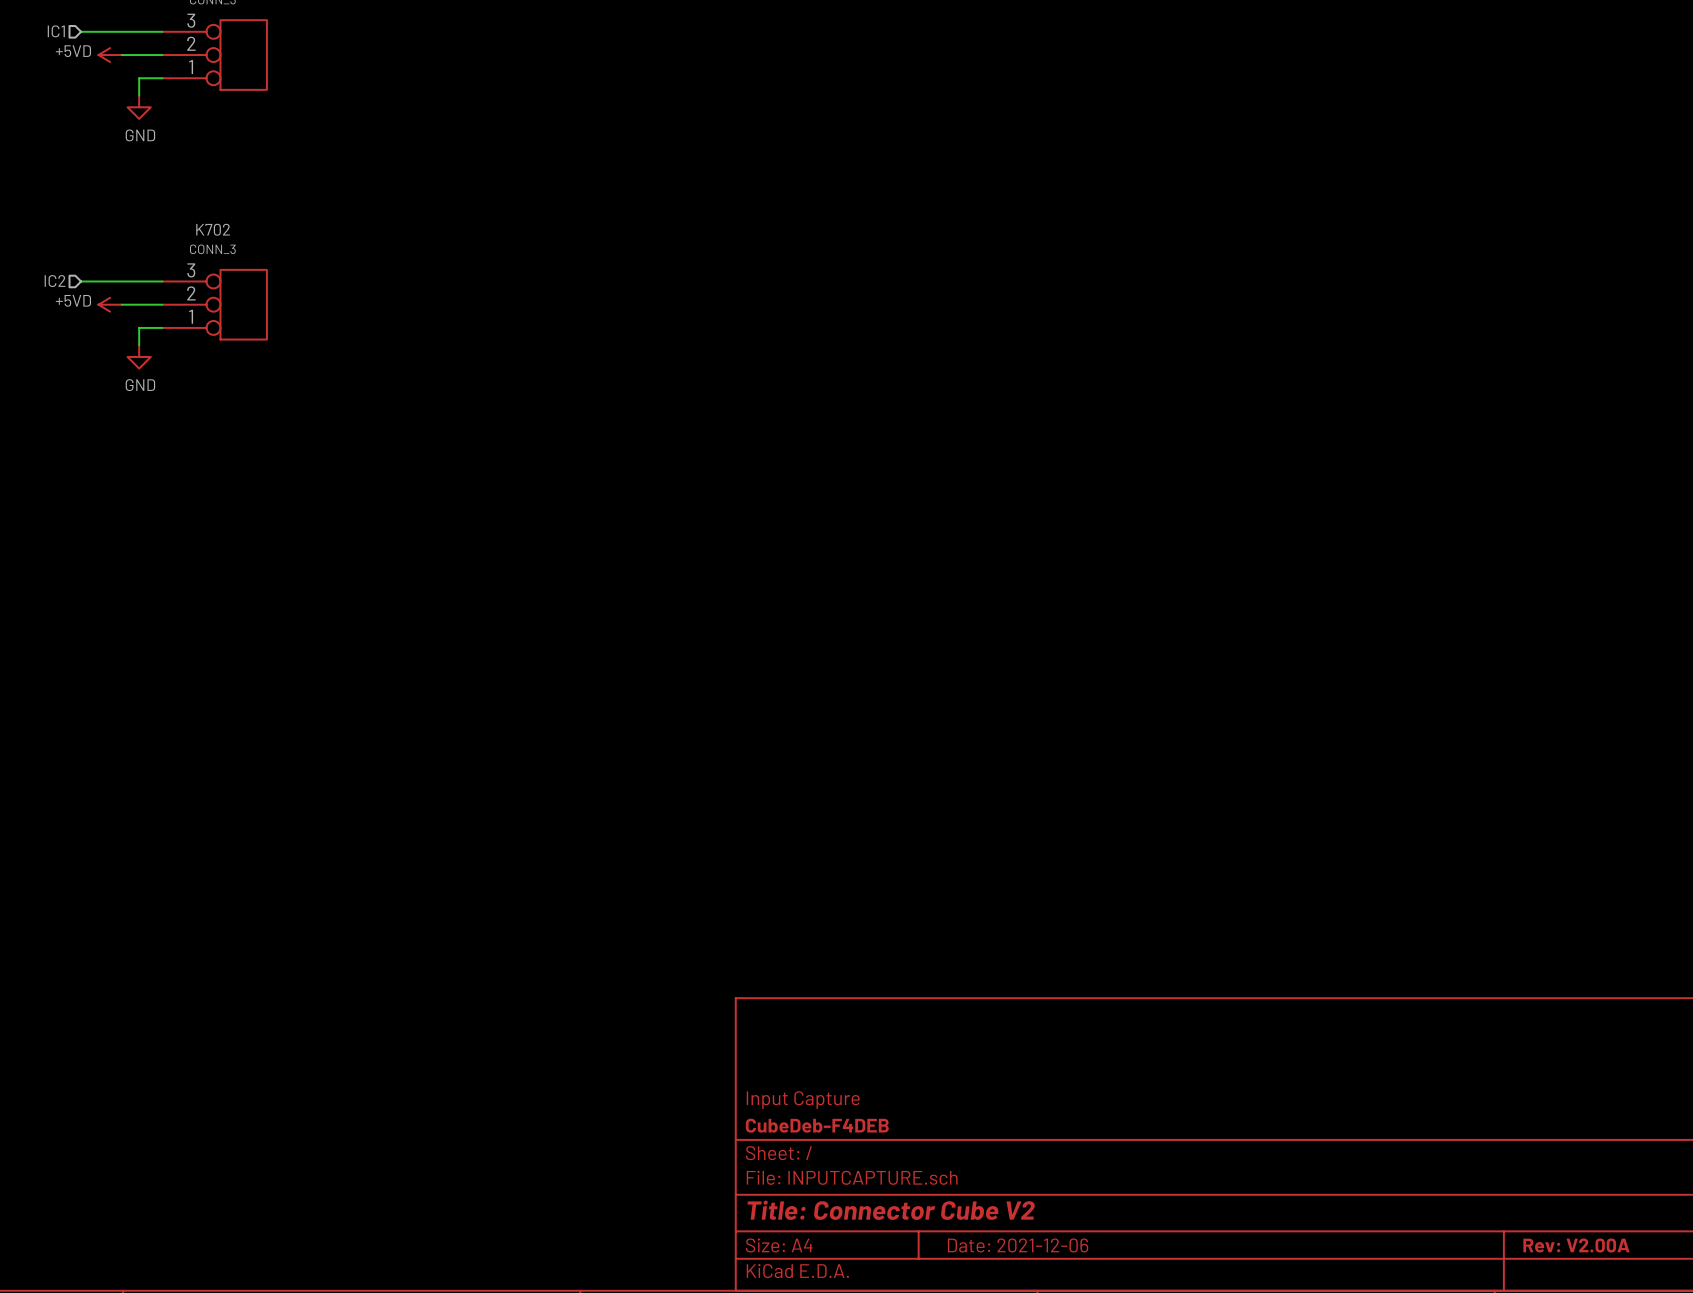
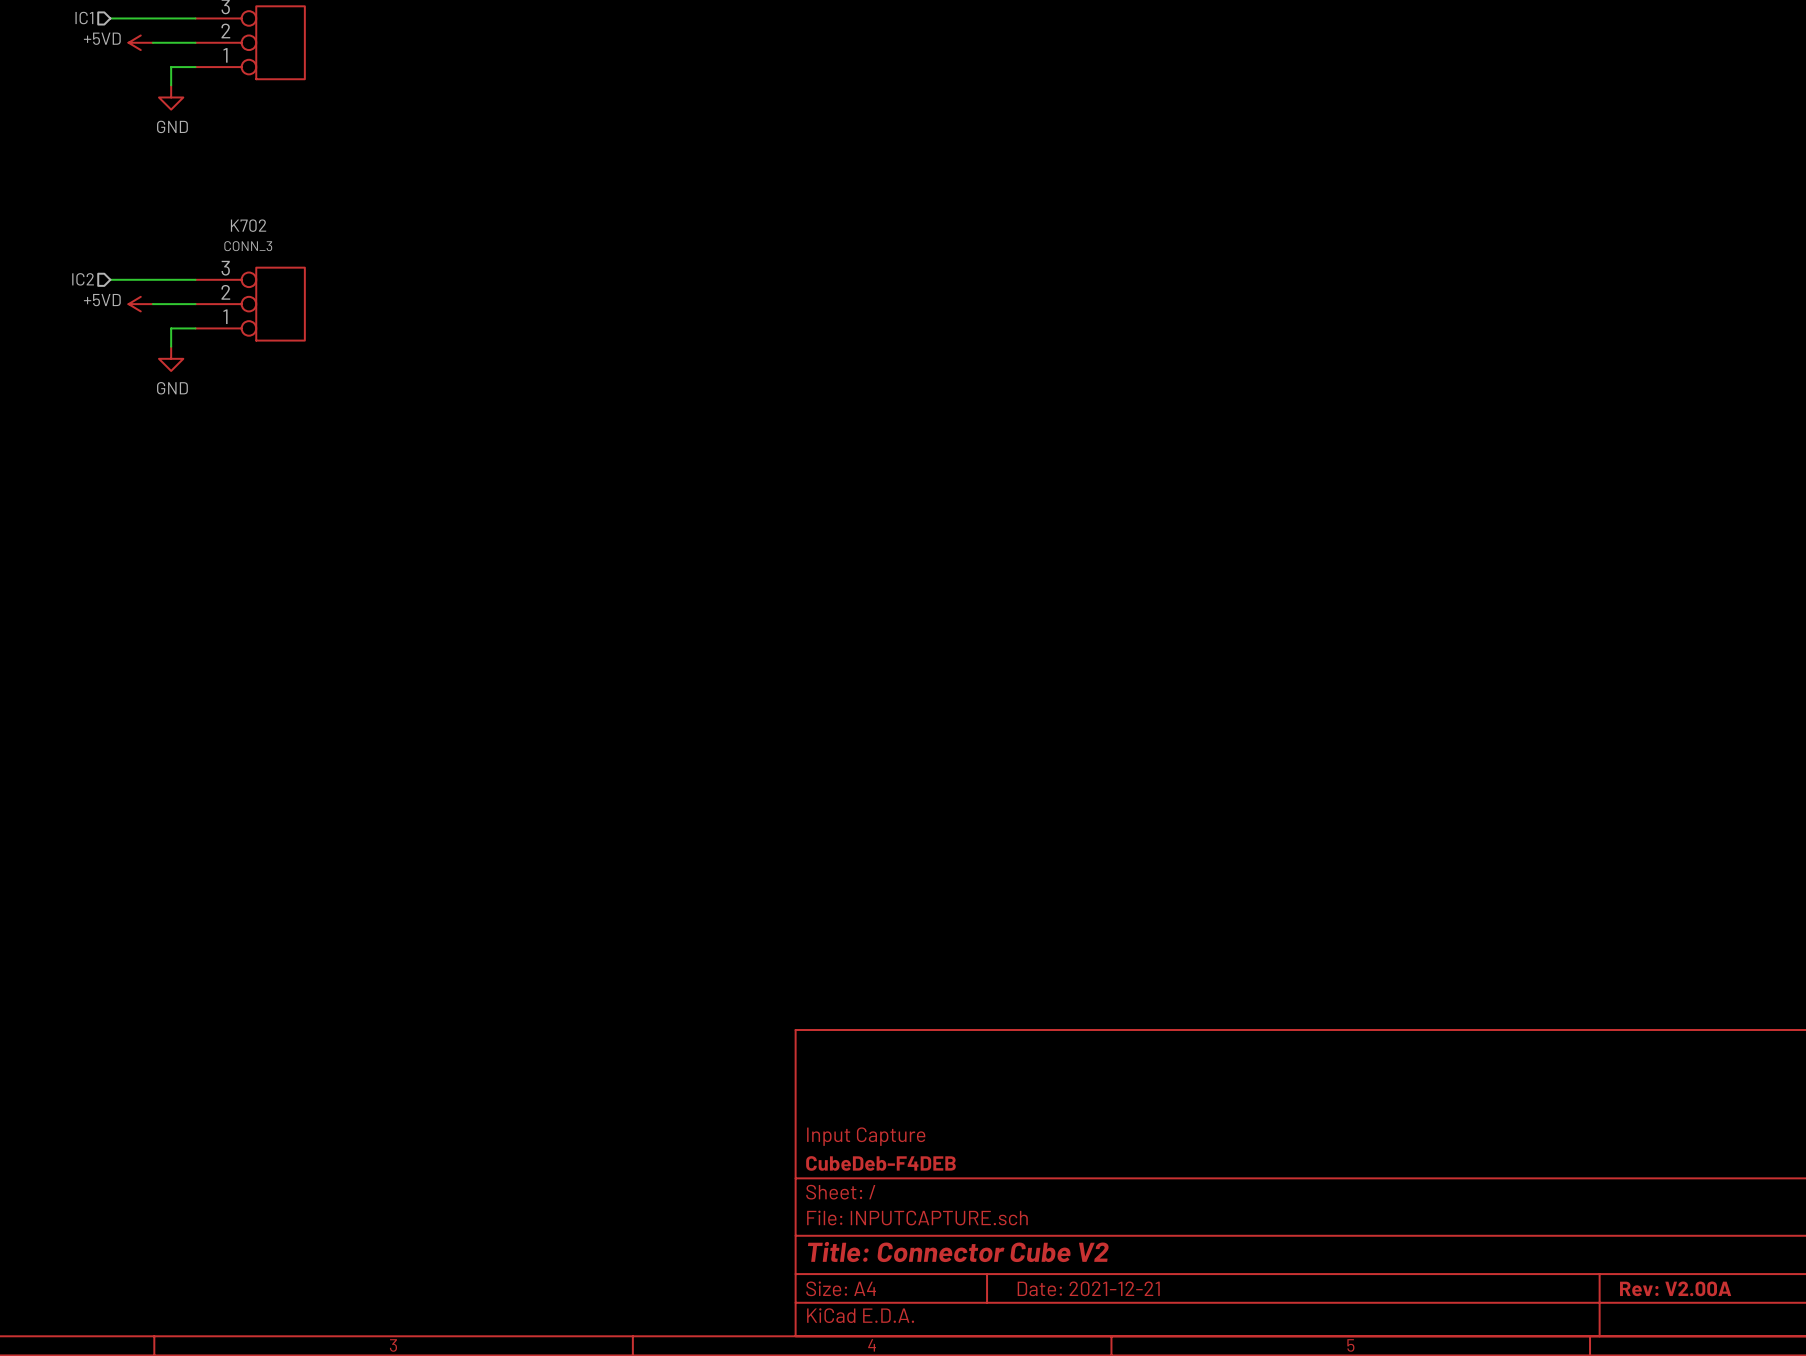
title block: Date: 2021-12-06 (1018, 1245) -> Date: 2021-12-21 (1088, 1288)

